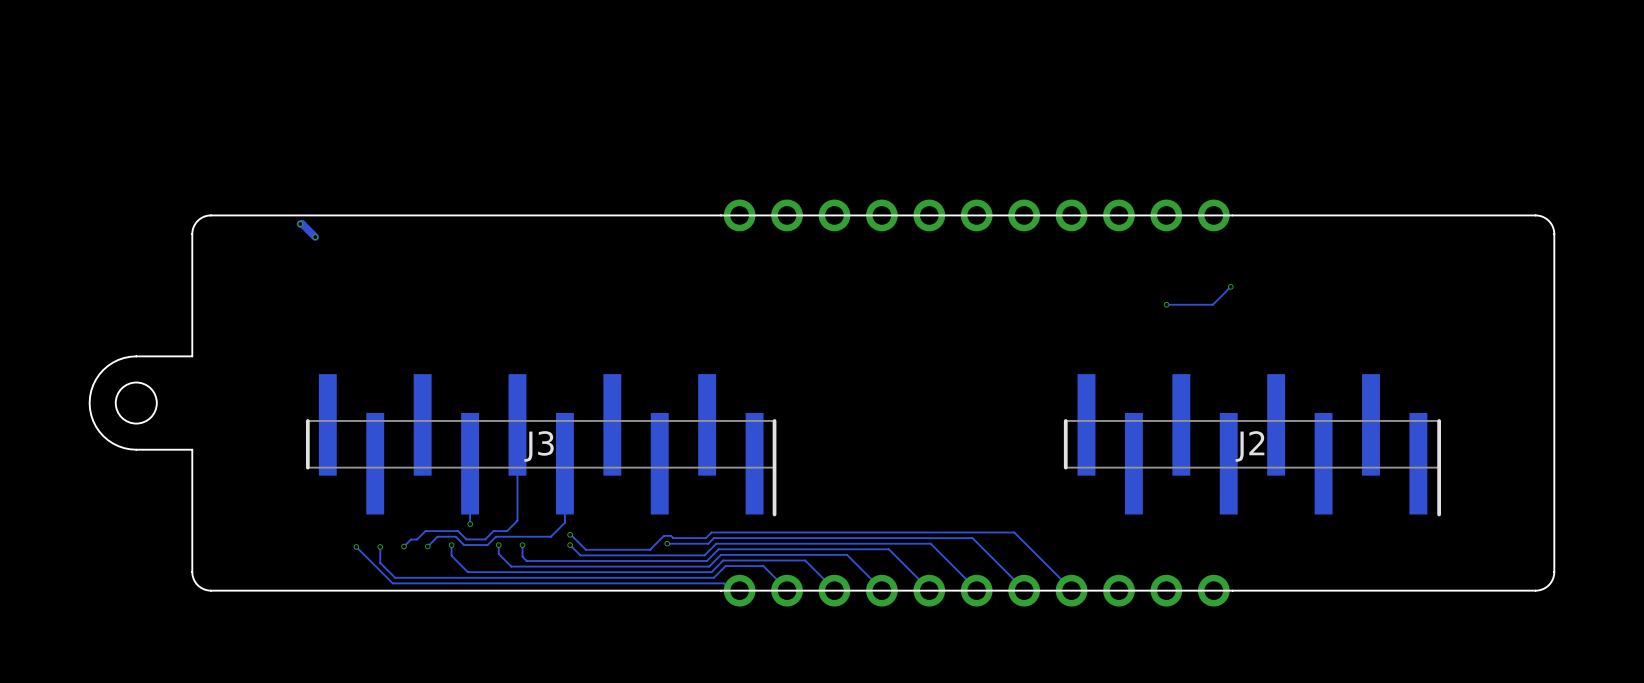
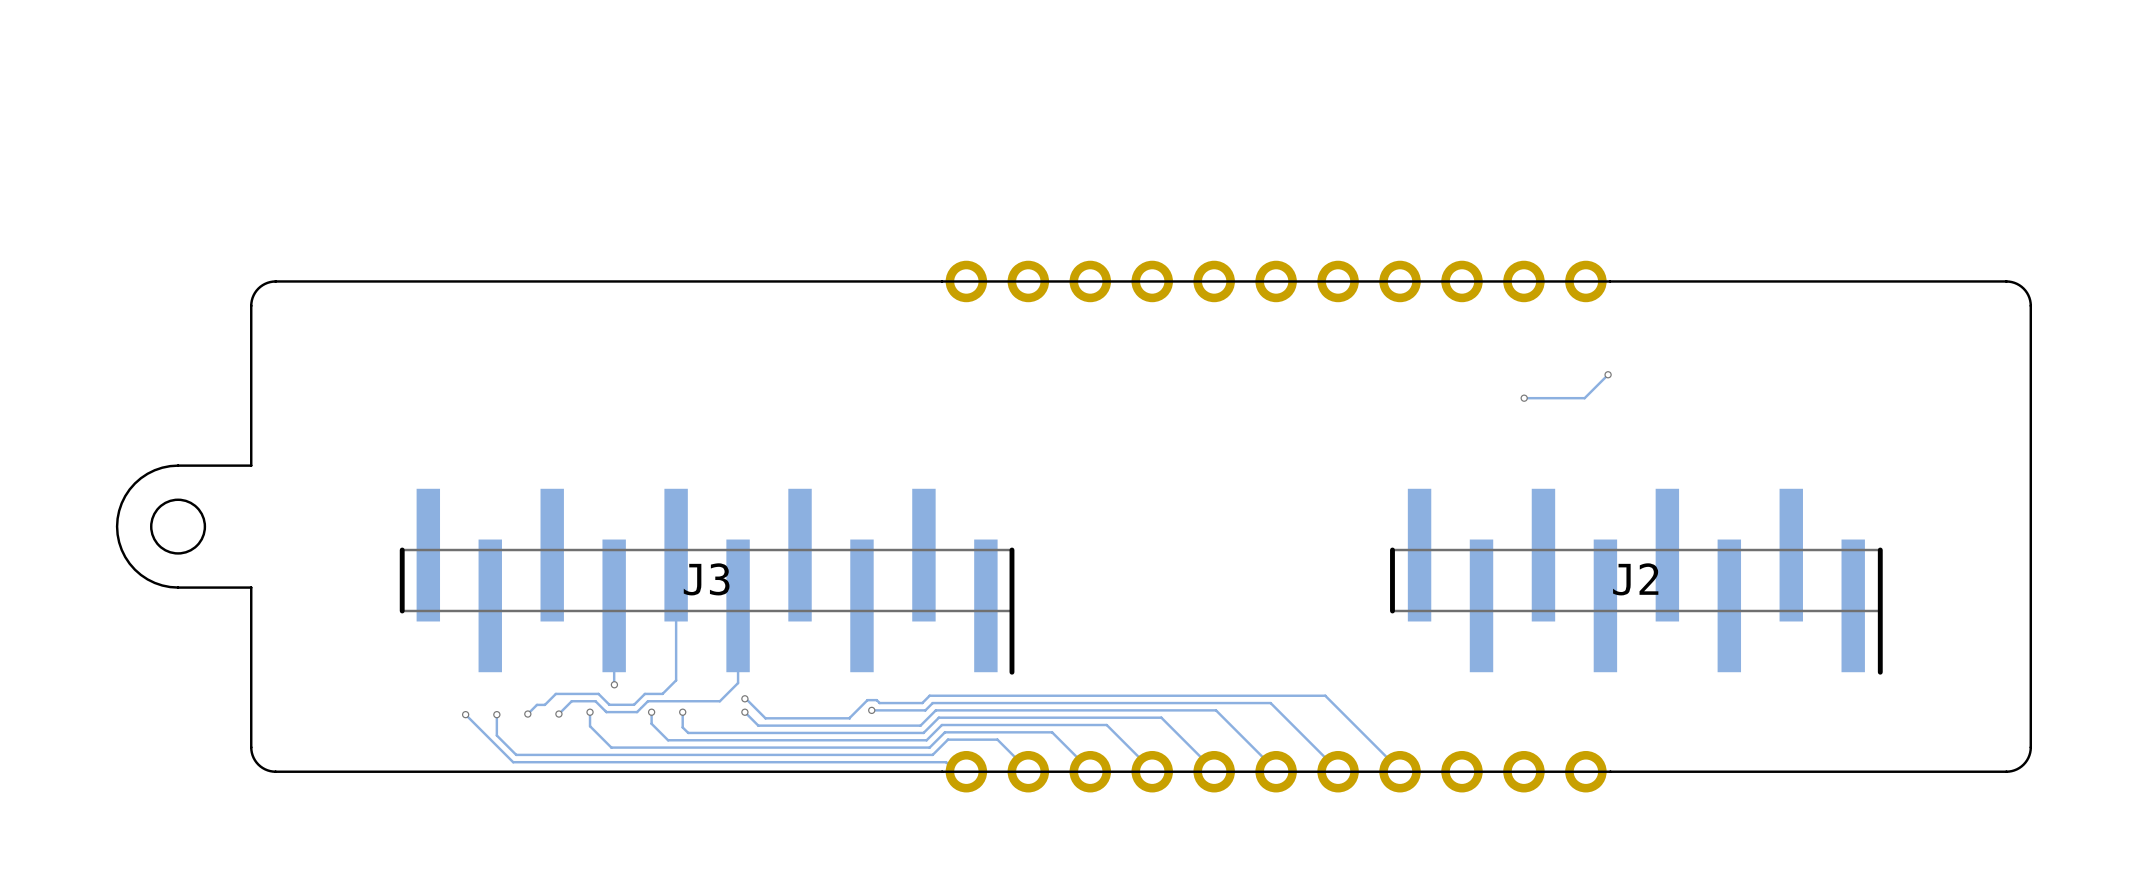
track: (300, 224) (315, 237) -> none
via: (300, 224) -> none
via: (315, 237) -> none

